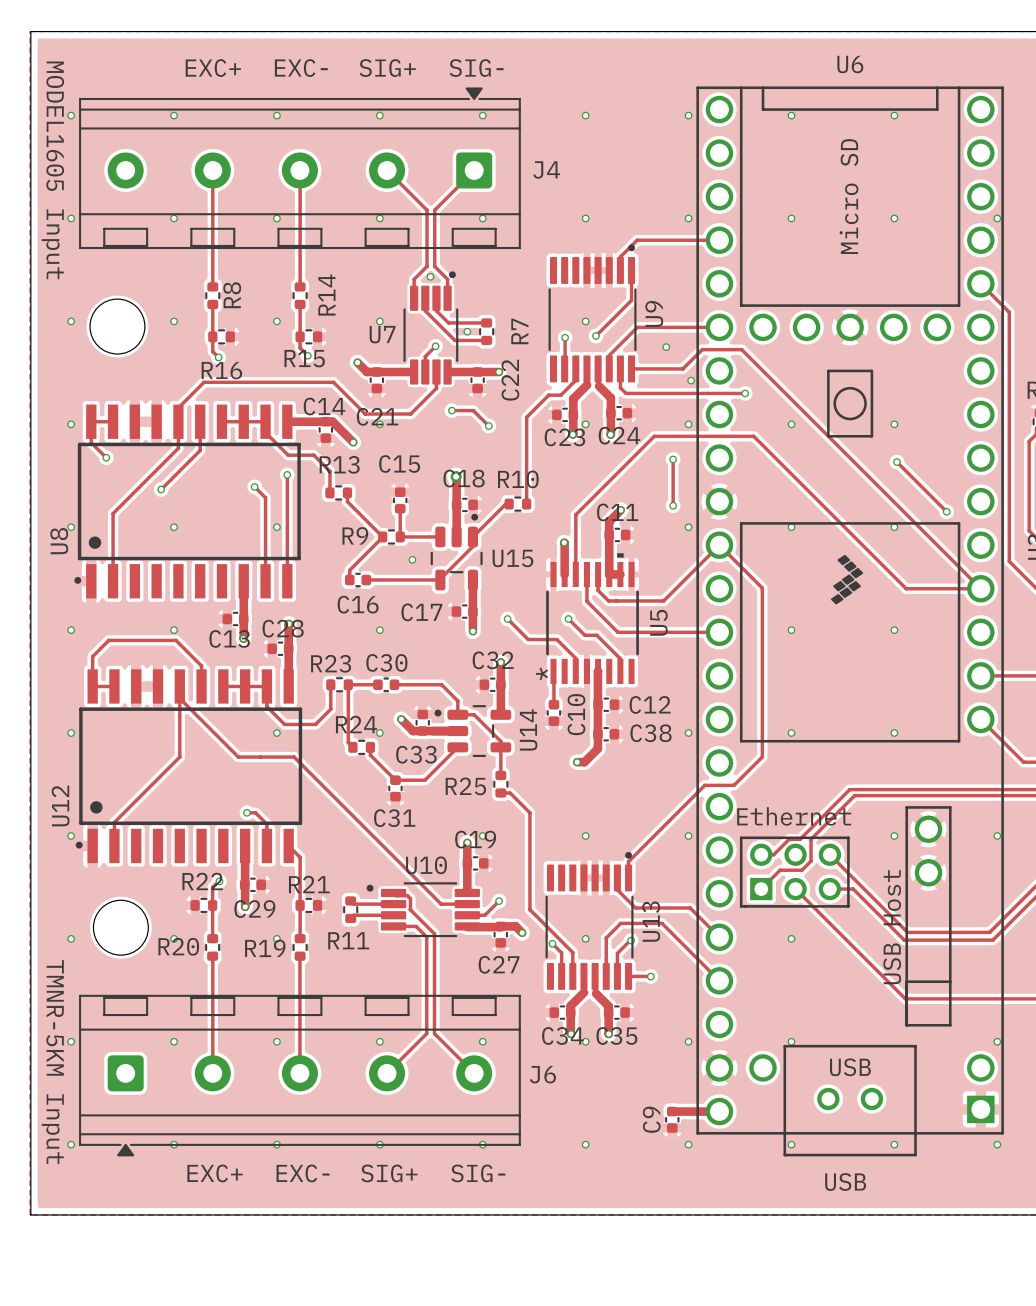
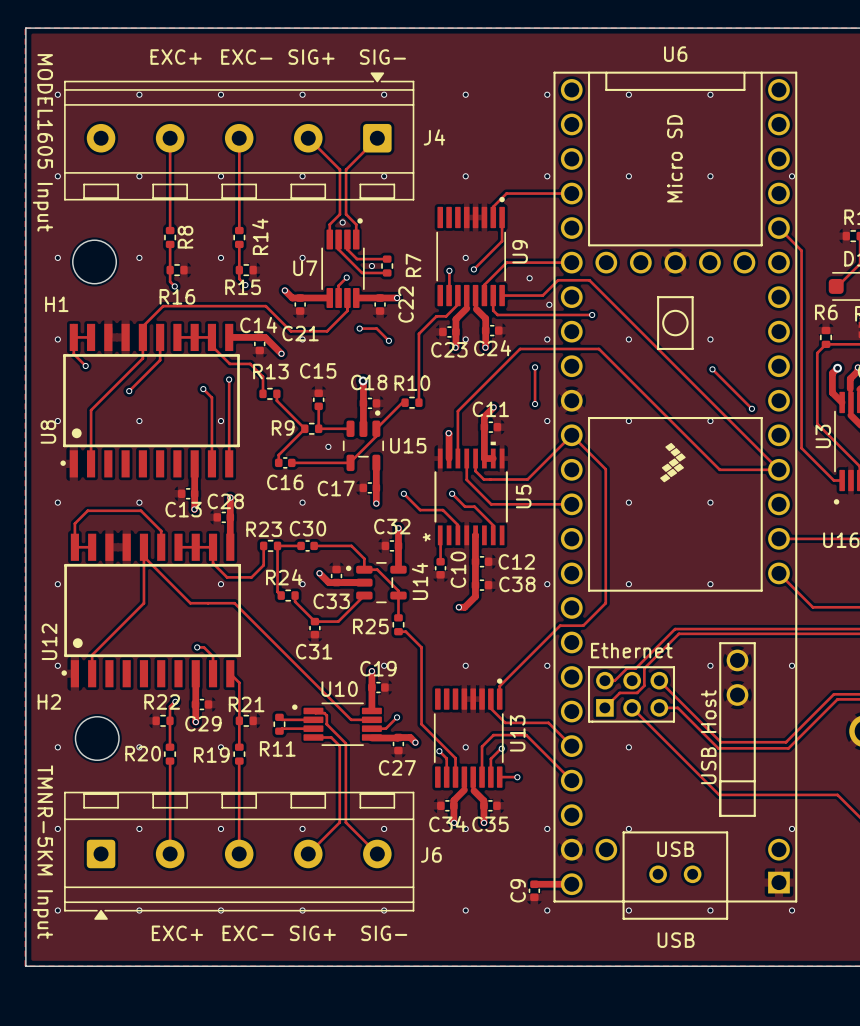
H1 name: none -> H1 (56, 304)
H2 name: none -> H2 (49, 701)

